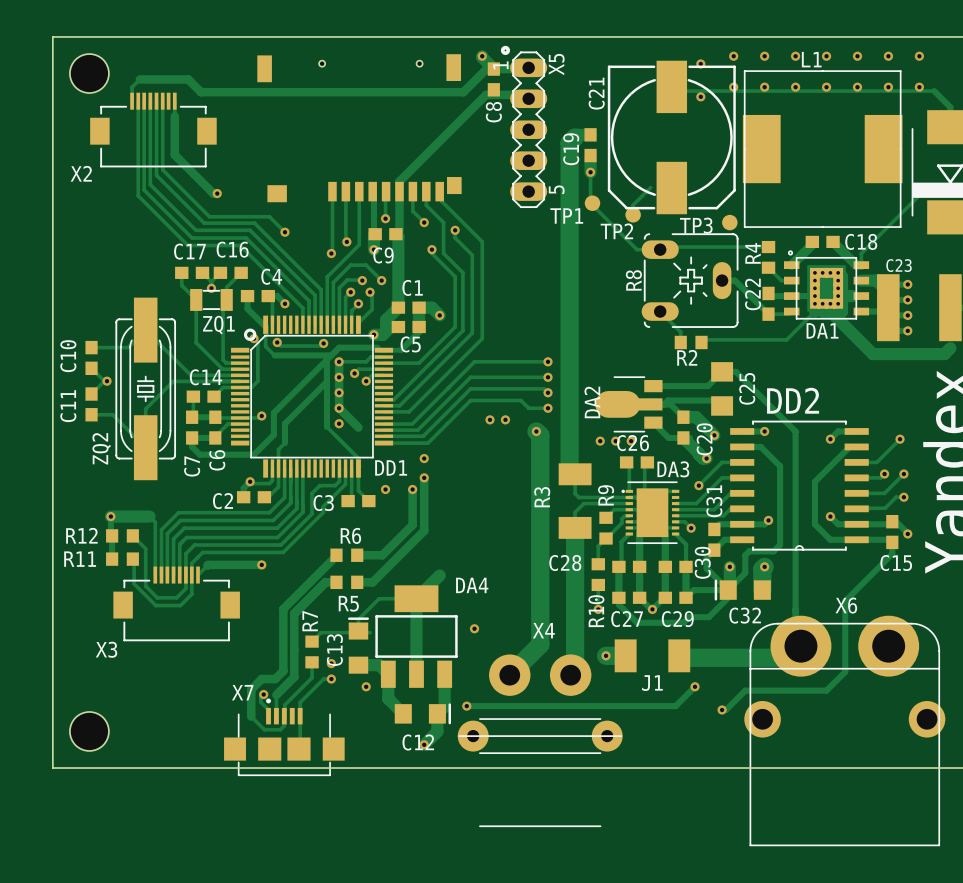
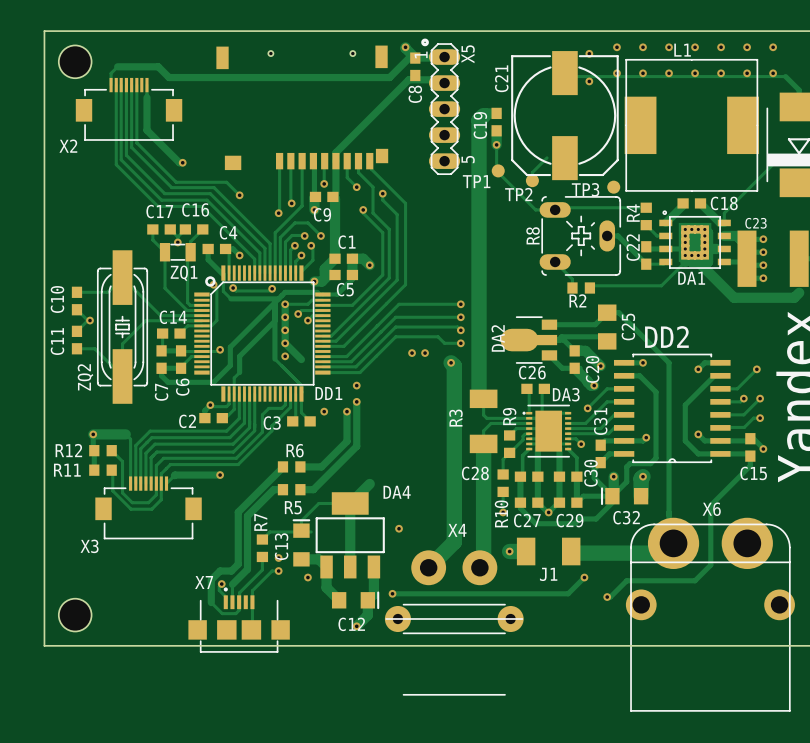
via: (600, 441) -> none
via: (615, 441) -> none
via: (631, 441) -> none

